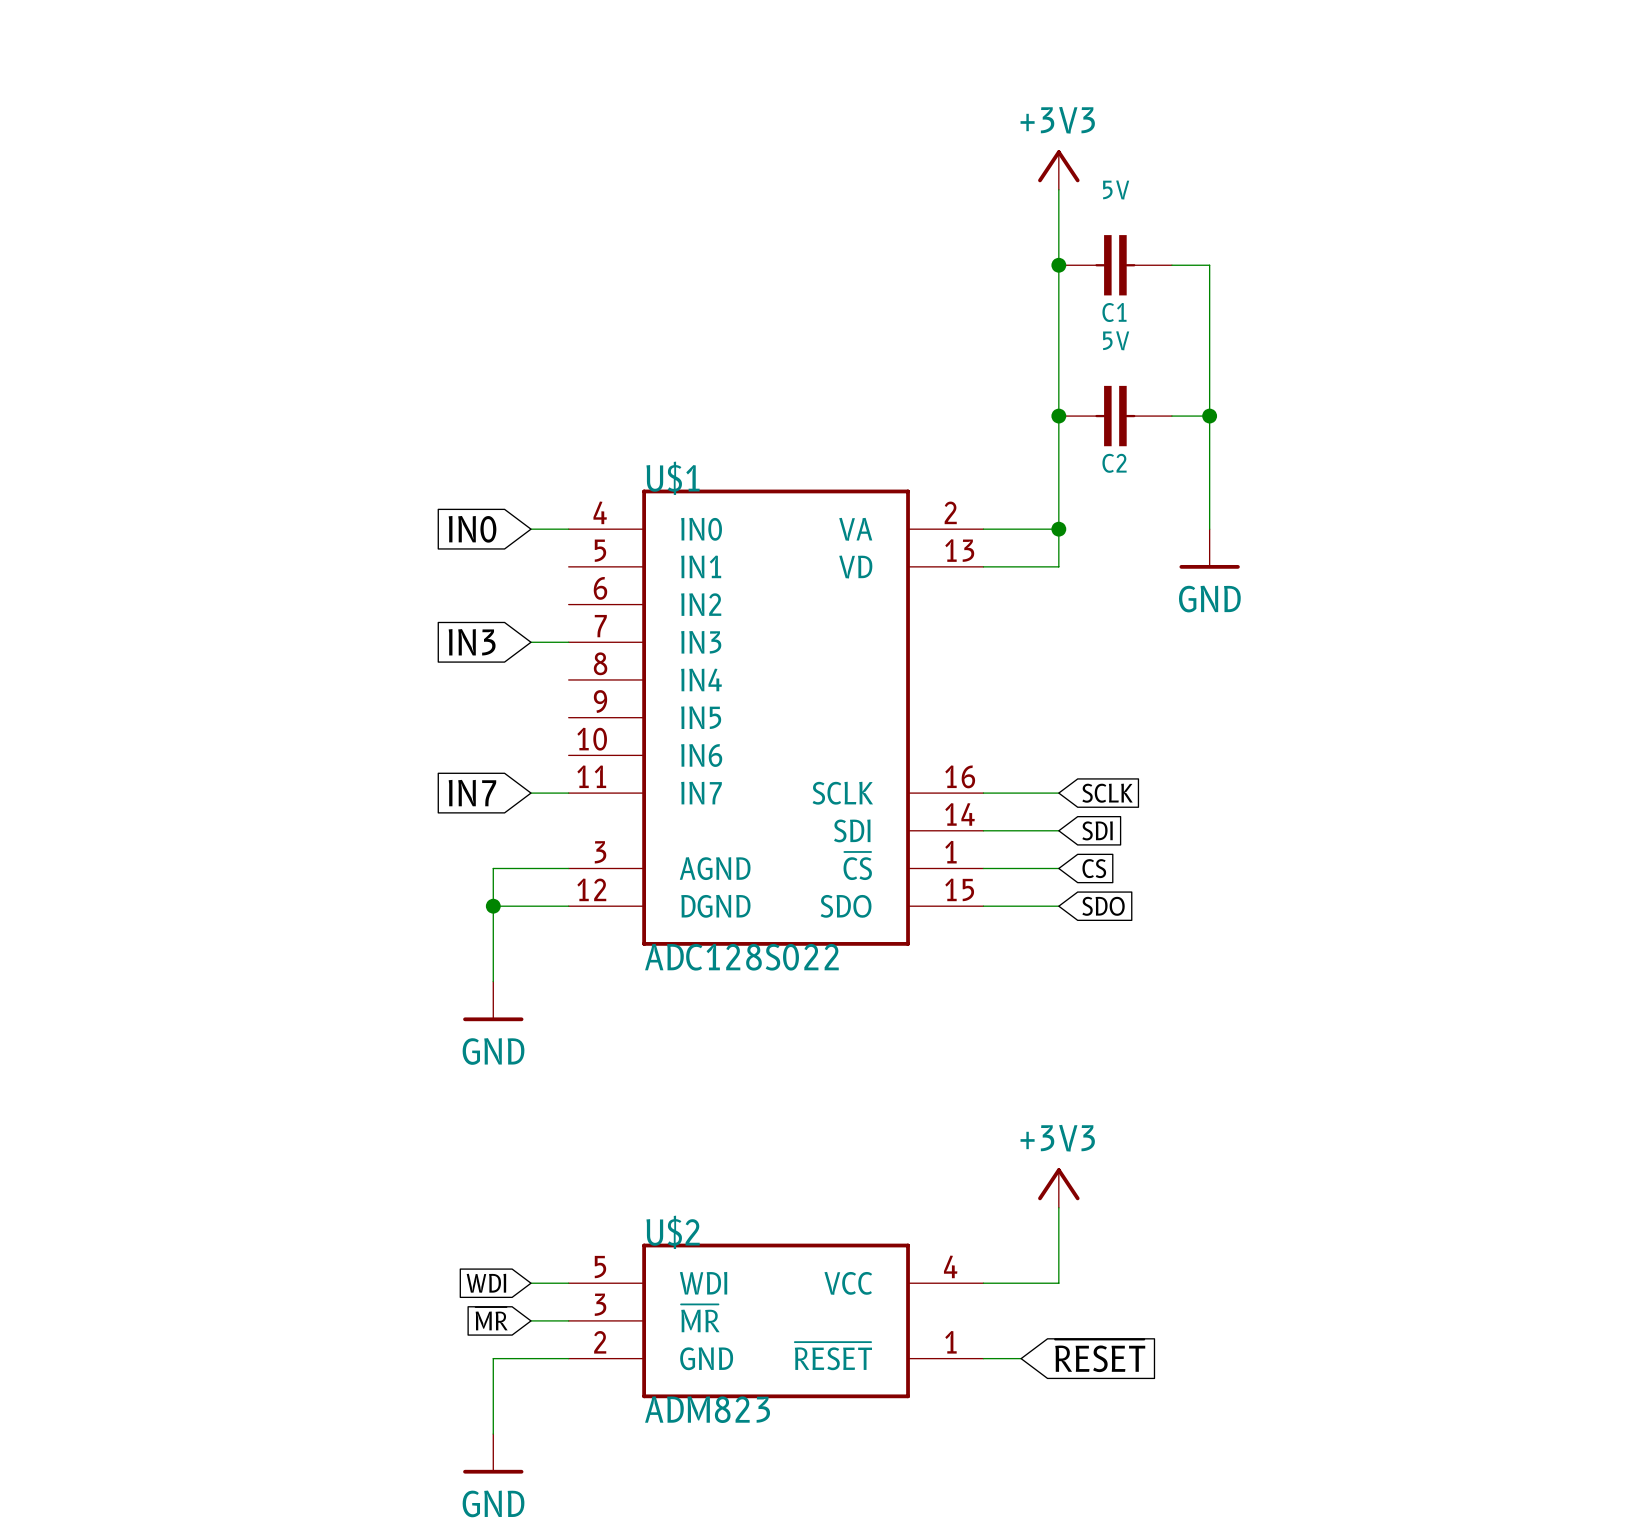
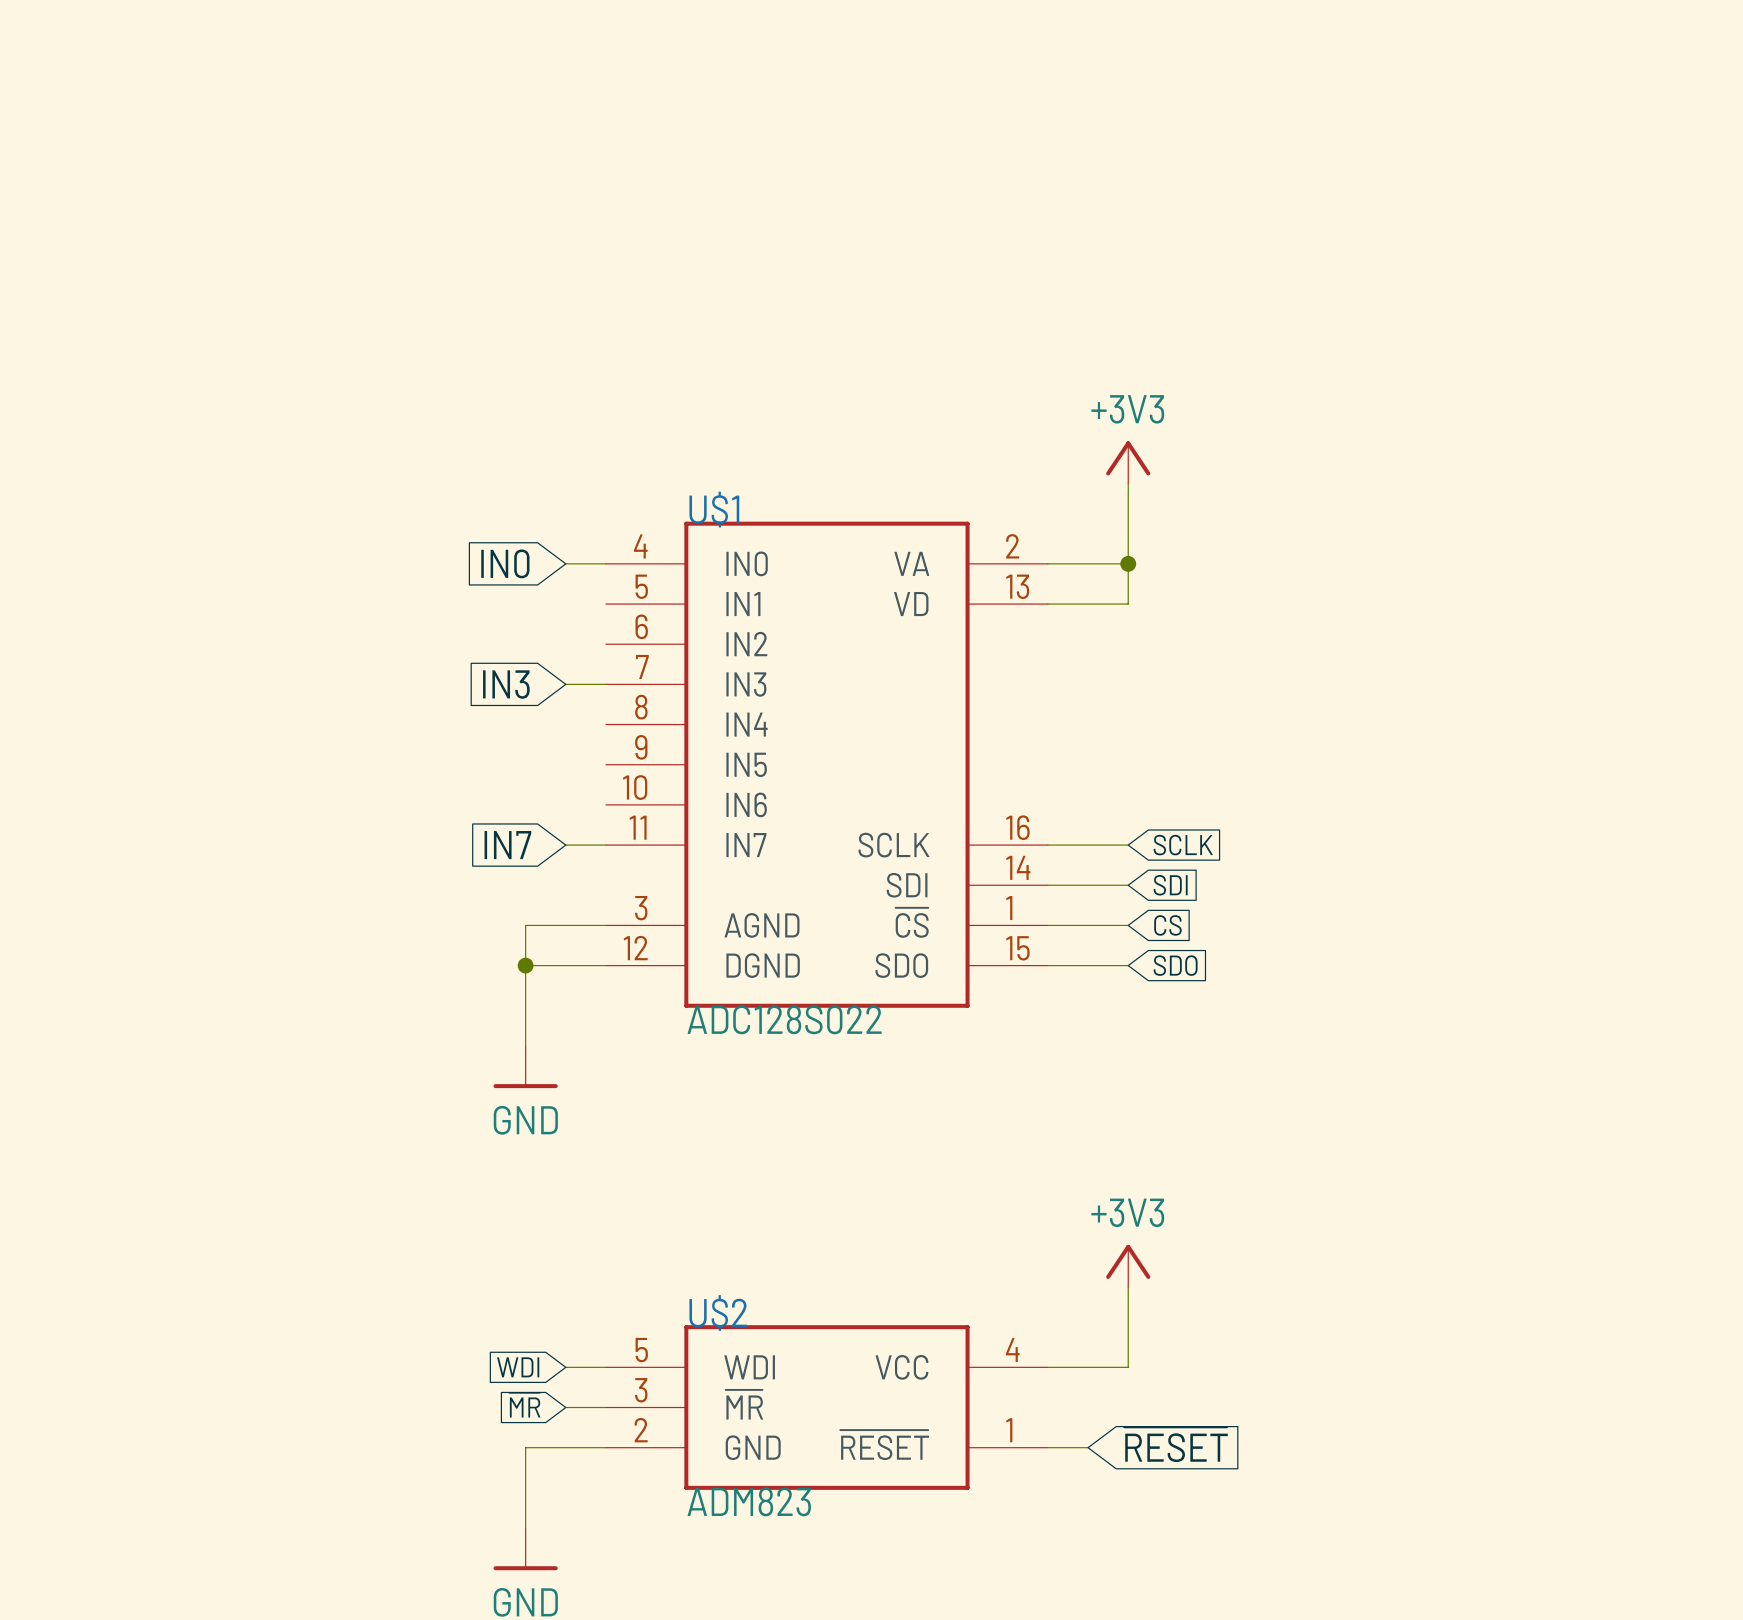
power symbol position: +3V3 (1058, 170) -> +3V3 (1128, 462)
wire: (1058, 189) (1058, 453) -> none
junction: (1058, 265) -> none
C1: (1115, 265) -> none
wire: (1171, 265) (1209, 265) (1209, 529) -> none
junction: (1058, 416) -> none
C2: (1115, 416) -> none
wire: (1171, 416) (1209, 416) -> none
junction: (1209, 416) -> none
power symbol: GND (1209, 548) -> none

